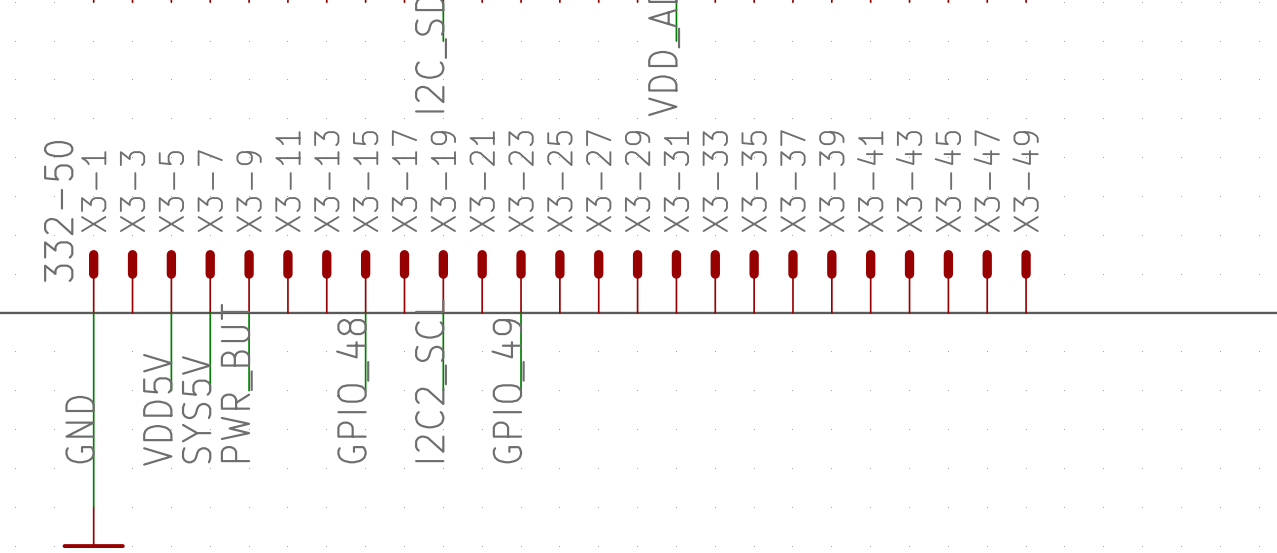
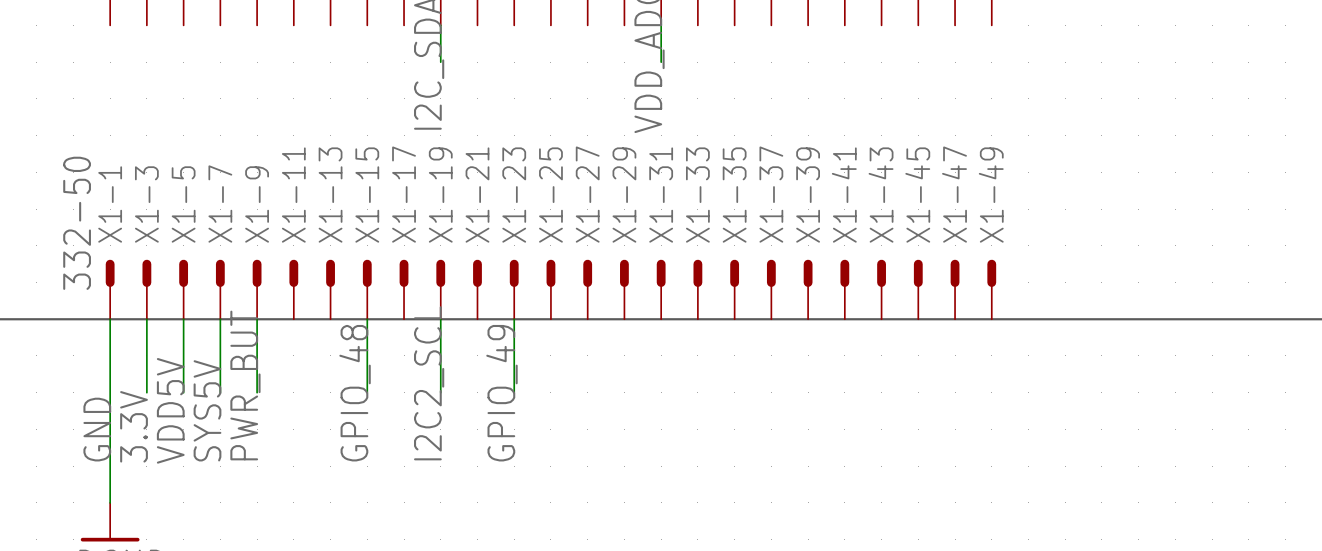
X3-11 name: X3-11 (287, 181) -> X1-11 (293, 195)
X3-13 name: X3-13 (326, 181) -> X1-13 (330, 195)
X3-15 name: X3-15 (365, 181) -> X1-15 (367, 195)
X3-17 name: X3-17 (404, 181) -> X1-17 (404, 194)
X3-19 name: X3-19 (443, 181) -> X1-19 (440, 195)
X3-21 name: X3-21 (482, 181) -> X1-21 (477, 195)
X3-23 name: X3-23 (521, 181) -> X1-23 (514, 195)
X3-25 name: X3-25 (559, 181) -> X1-25 (550, 195)
X3-27 name: X3-27 (598, 181) -> X1-27 (587, 194)
X3-29 name: X3-29 (637, 181) -> X1-29 (624, 195)
X3-31 name: X3-31 (676, 181) -> X1-31 (661, 195)
X3-33 name: X3-33 (715, 181) -> X1-33 (697, 195)
X3-35 name: X3-35 (754, 181) -> X1-35 (734, 195)
X3-37 name: X3-37 (792, 181) -> X1-37 (771, 194)
X3-39 name: X3-39 (831, 181) -> X1-39 (808, 195)
X3-41 name: X3-41 (870, 181) -> X1-41 (844, 195)
X3-43 name: X3-43 (908, 181) -> X1-43 (881, 195)
X3-45 name: X3-45 (947, 181) -> X1-45 (917, 195)
X3-47 name: X3-47 (986, 181) -> X1-47 (954, 194)
X3-49 name: X3-49 (1025, 181) -> X1-49 (991, 195)
X3-1 name: X3-1 (93, 191) -> X1-1 (110, 204)
X3-3 name: X3-3 (132, 191) -> X1-3 (146, 204)
X3-5 name: X3-5 (171, 191) -> X1-5 (183, 204)
X3-7 name: X3-7 (210, 191) -> X1-7 (220, 204)
X3-9 name: X3-9 (249, 191) -> X1-9 (257, 204)
wire: none -> (146, 319) (146, 392)
label: none -> 3.3V (134, 426)

